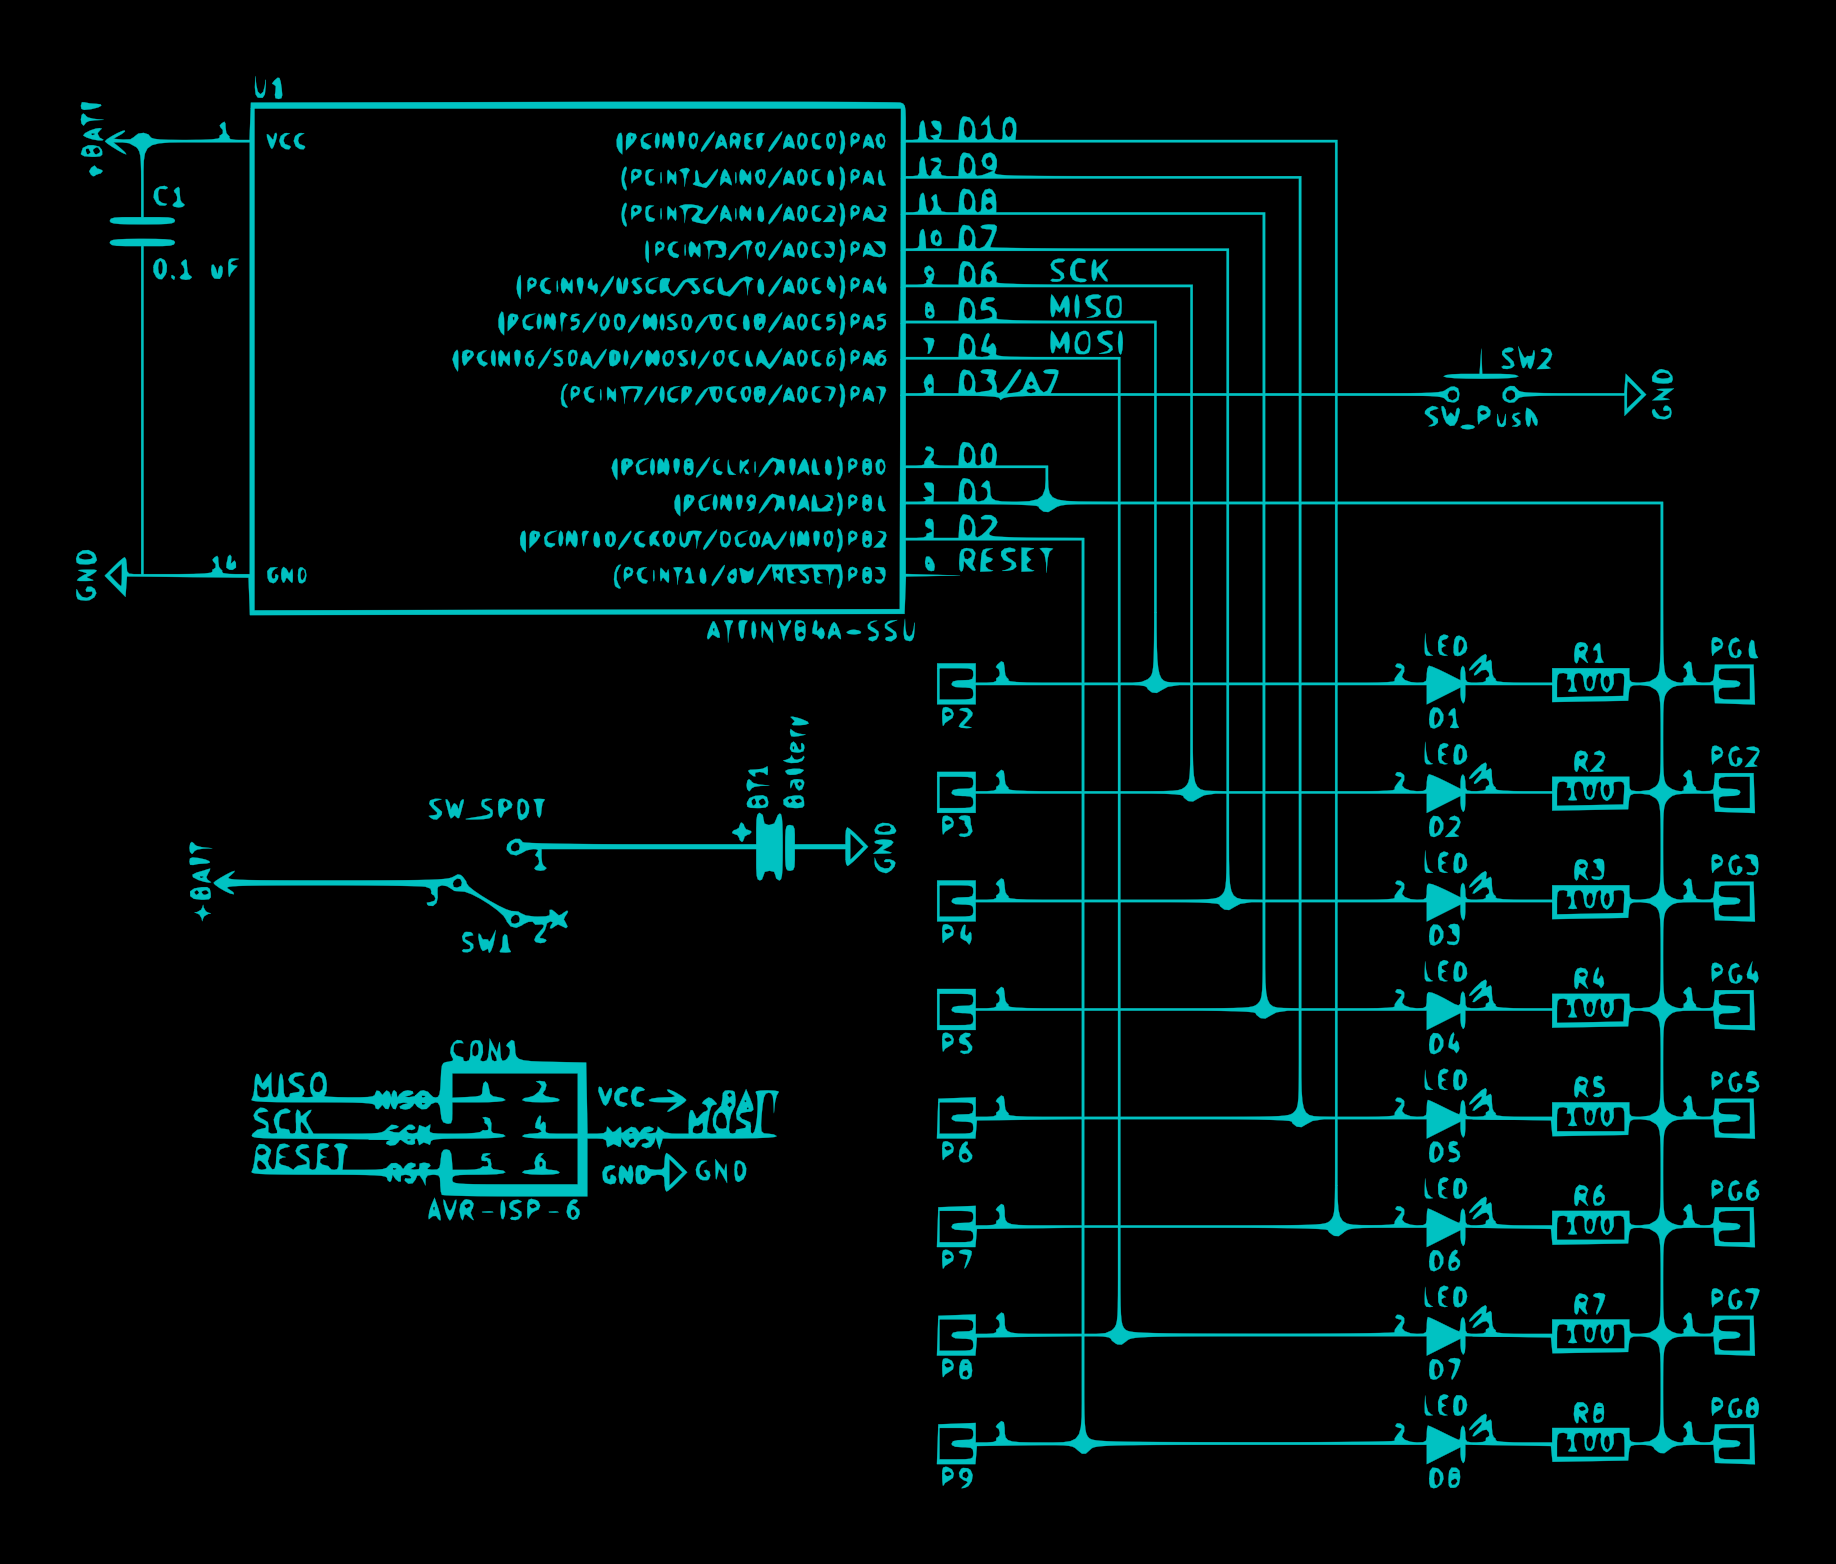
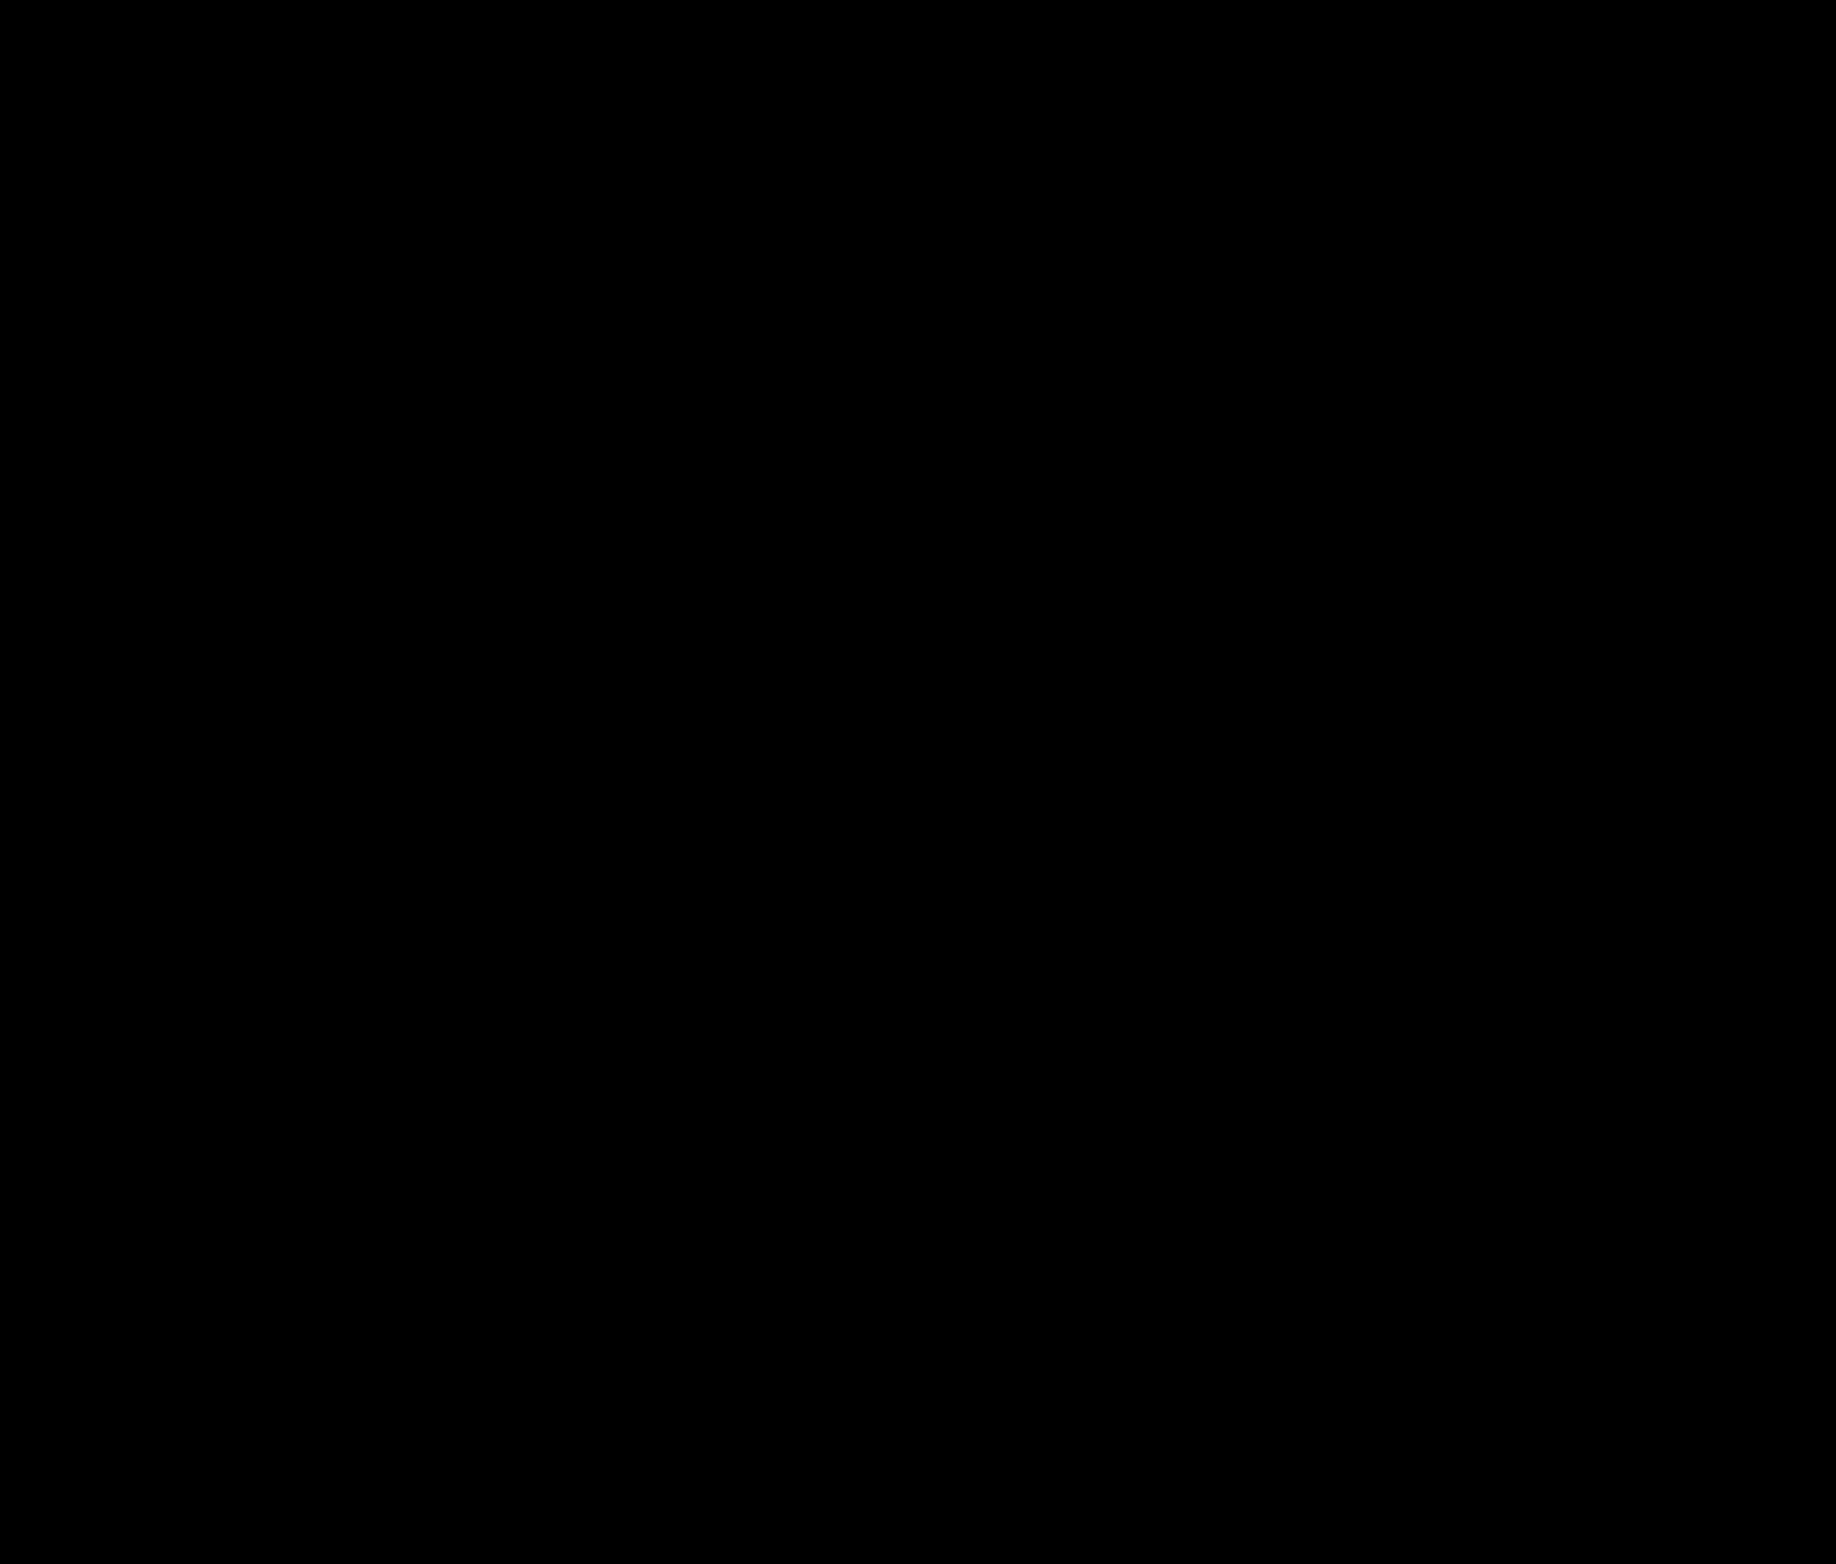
drawing: [75, 75, 1760, 1489] -> none

